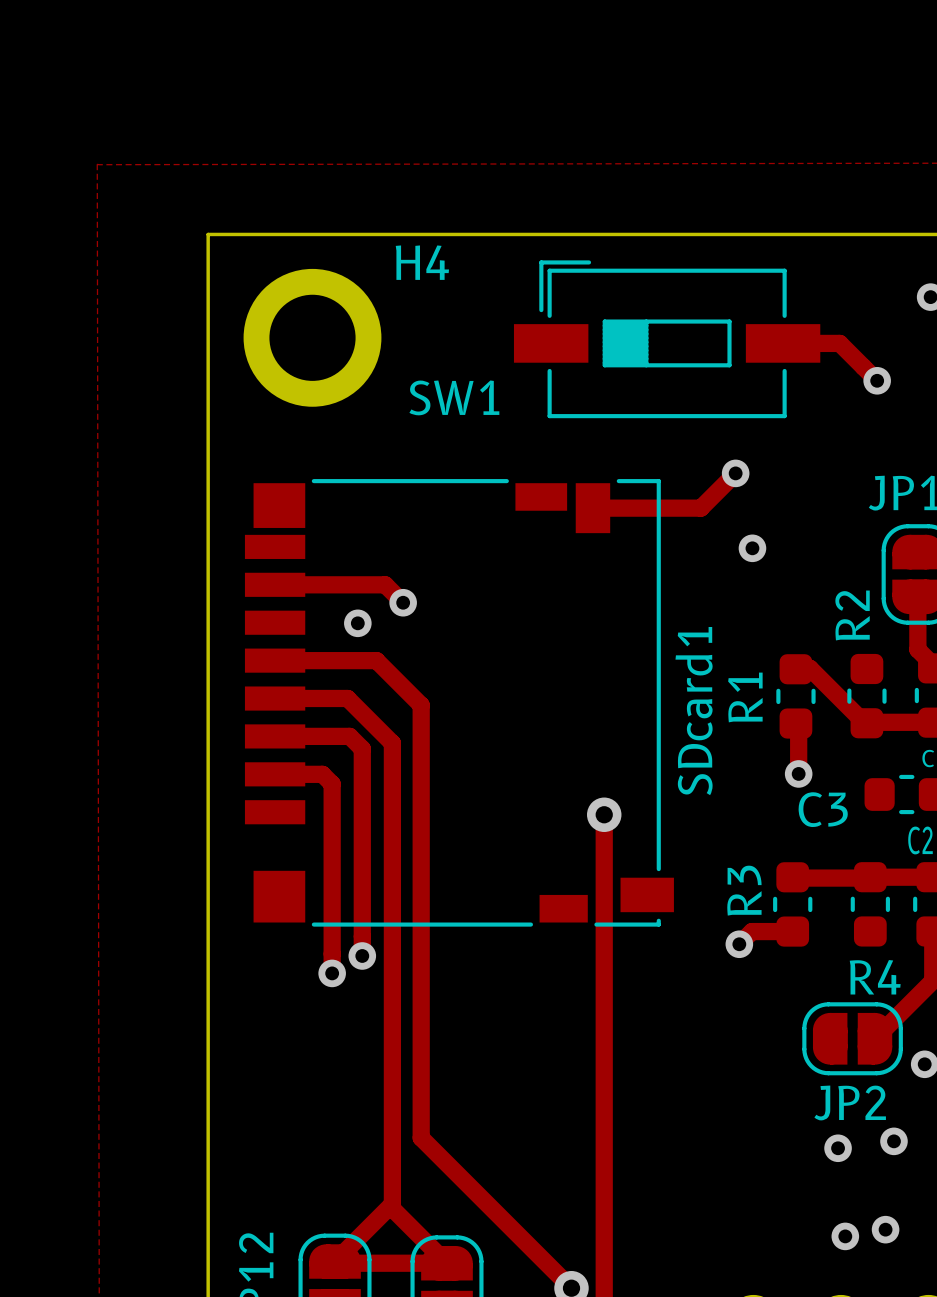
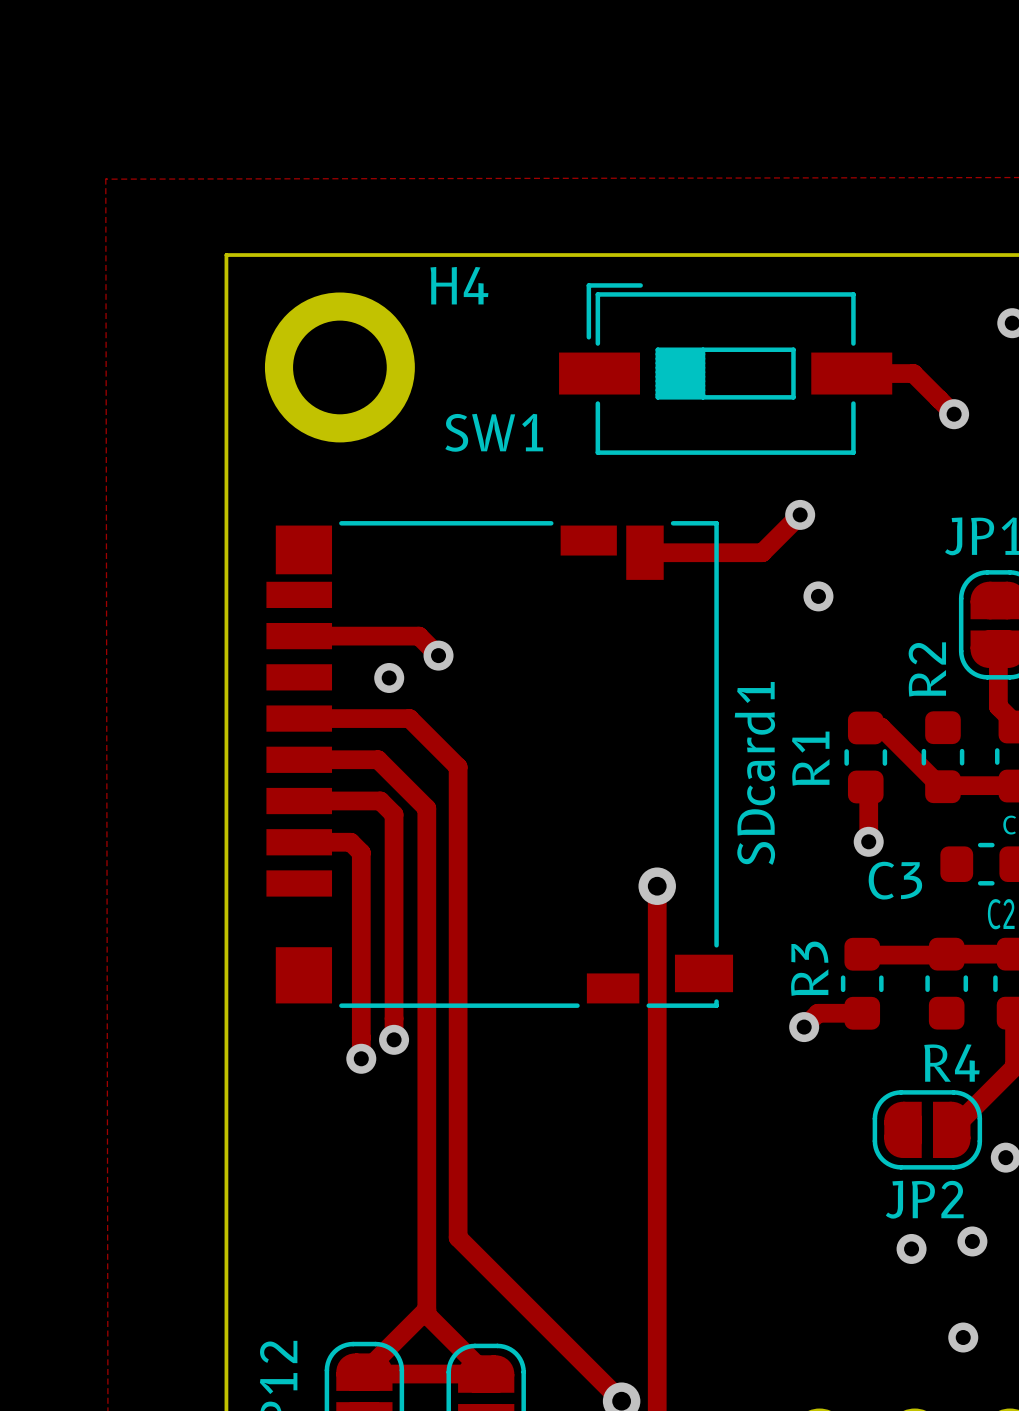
via: (845, 1236) -> none

